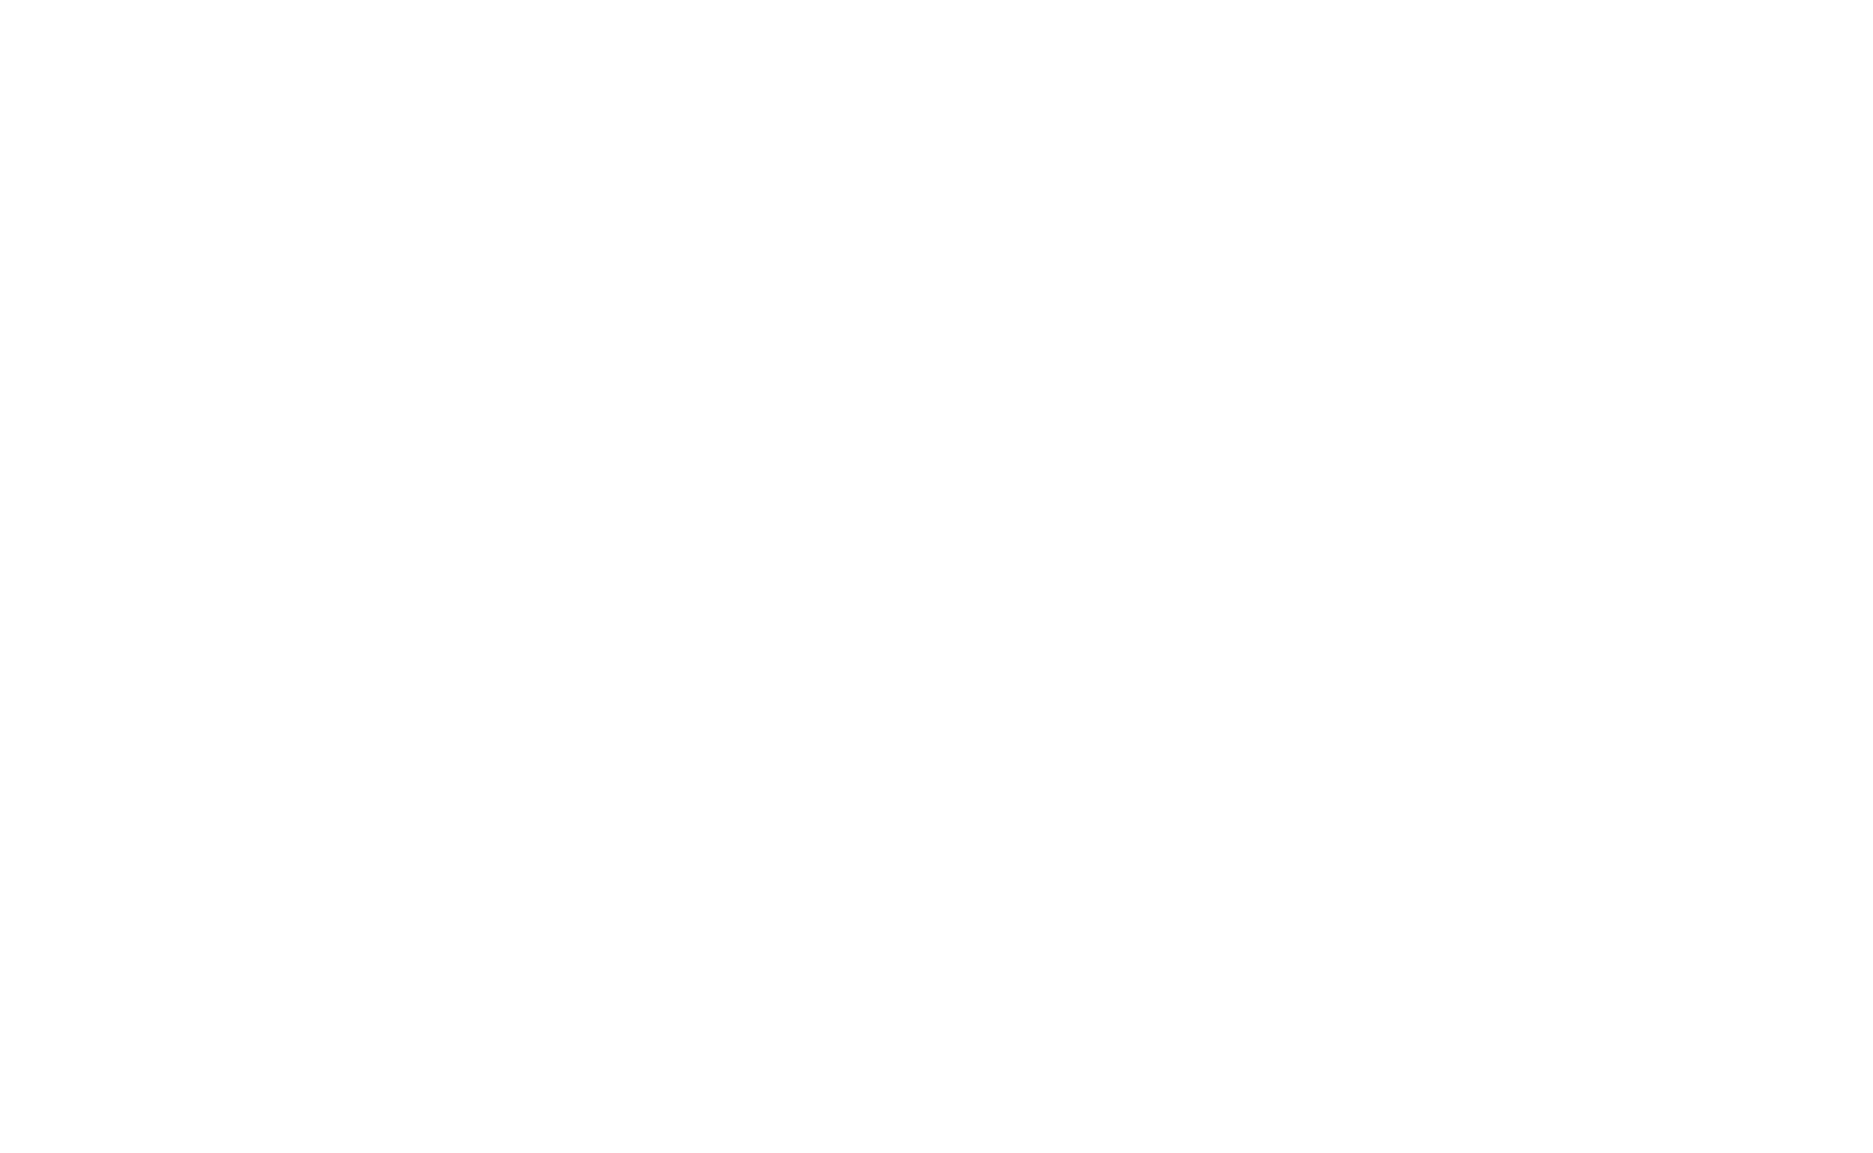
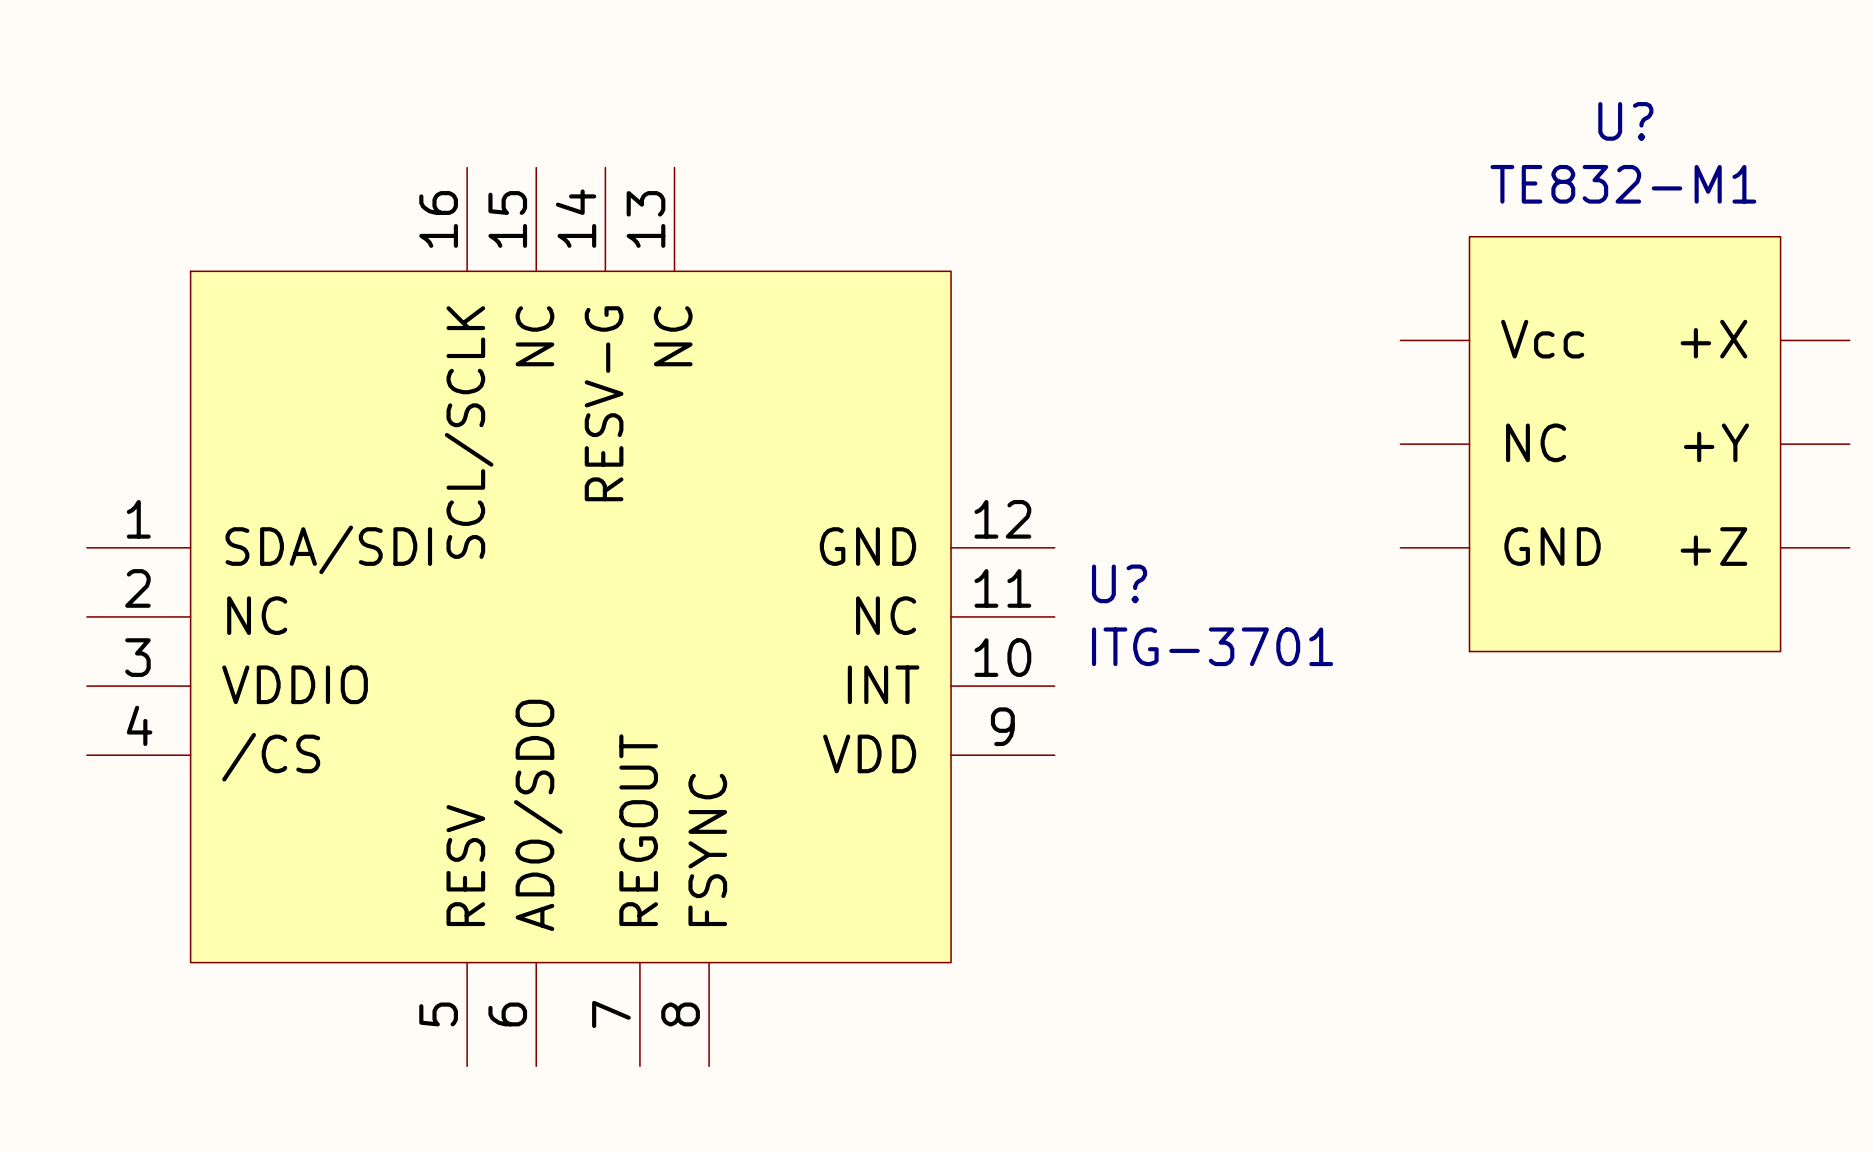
U?: none -> TE832-M1 (1625, 444)
U?: none -> ITG-3701 (570, 616)

